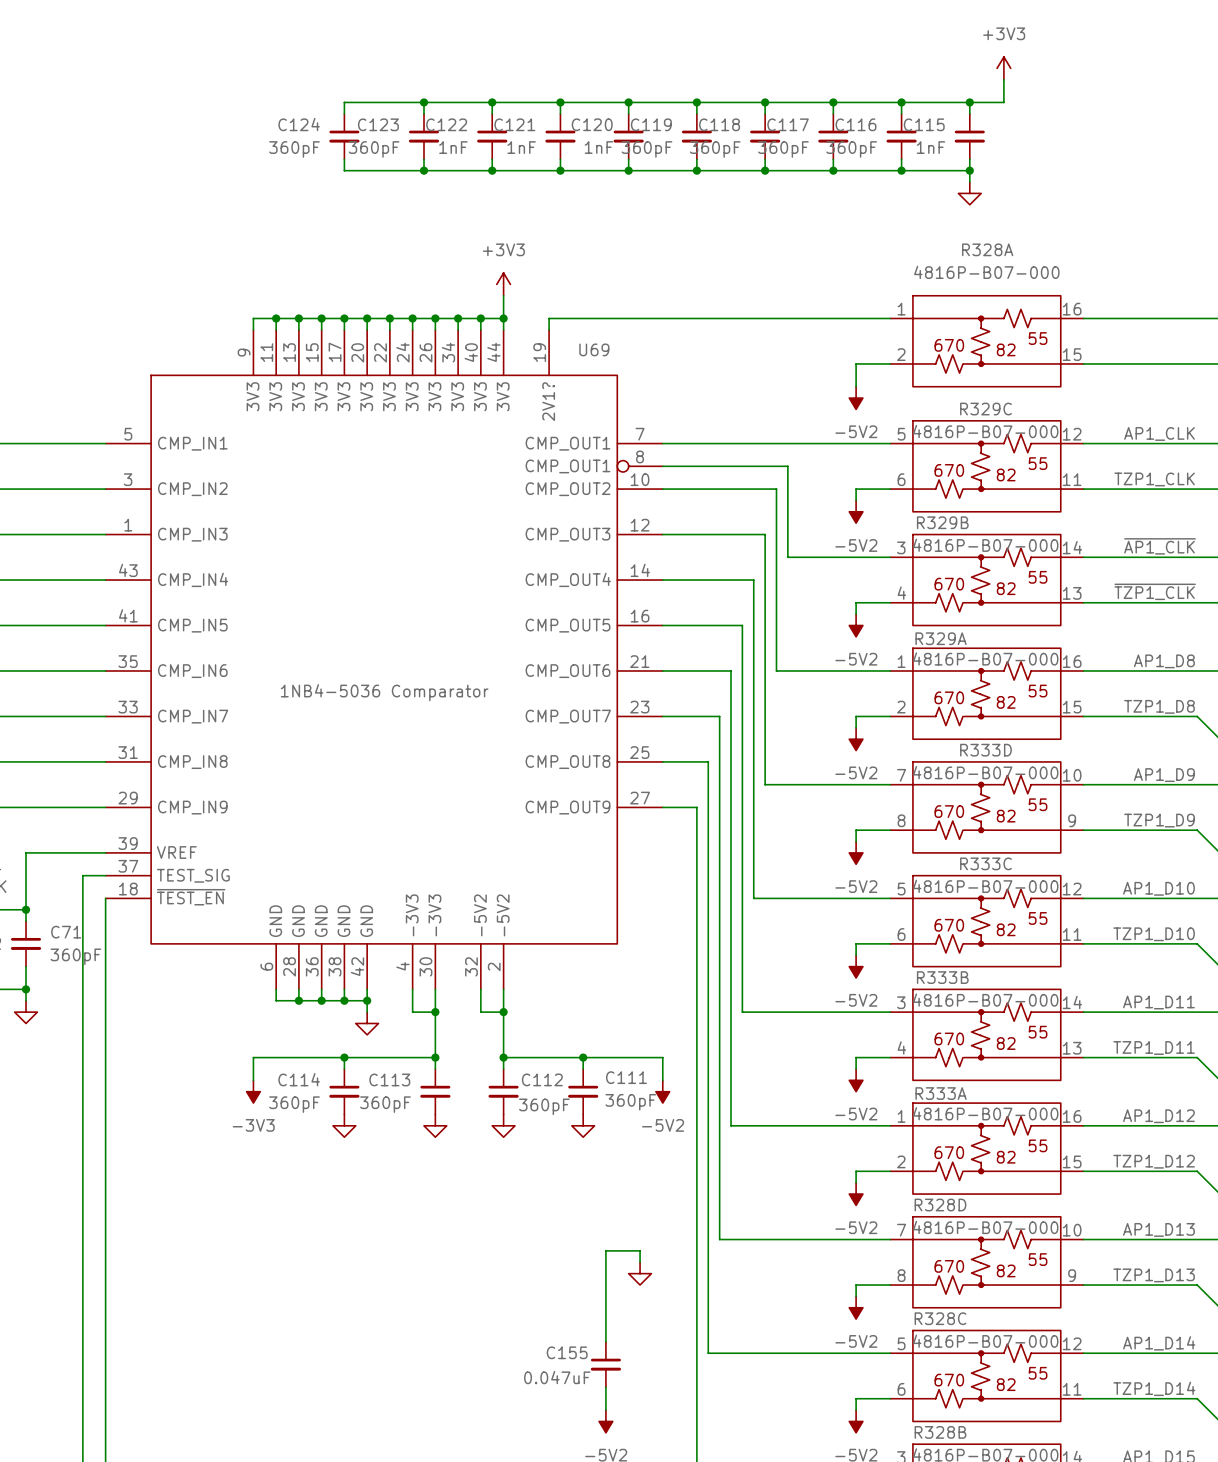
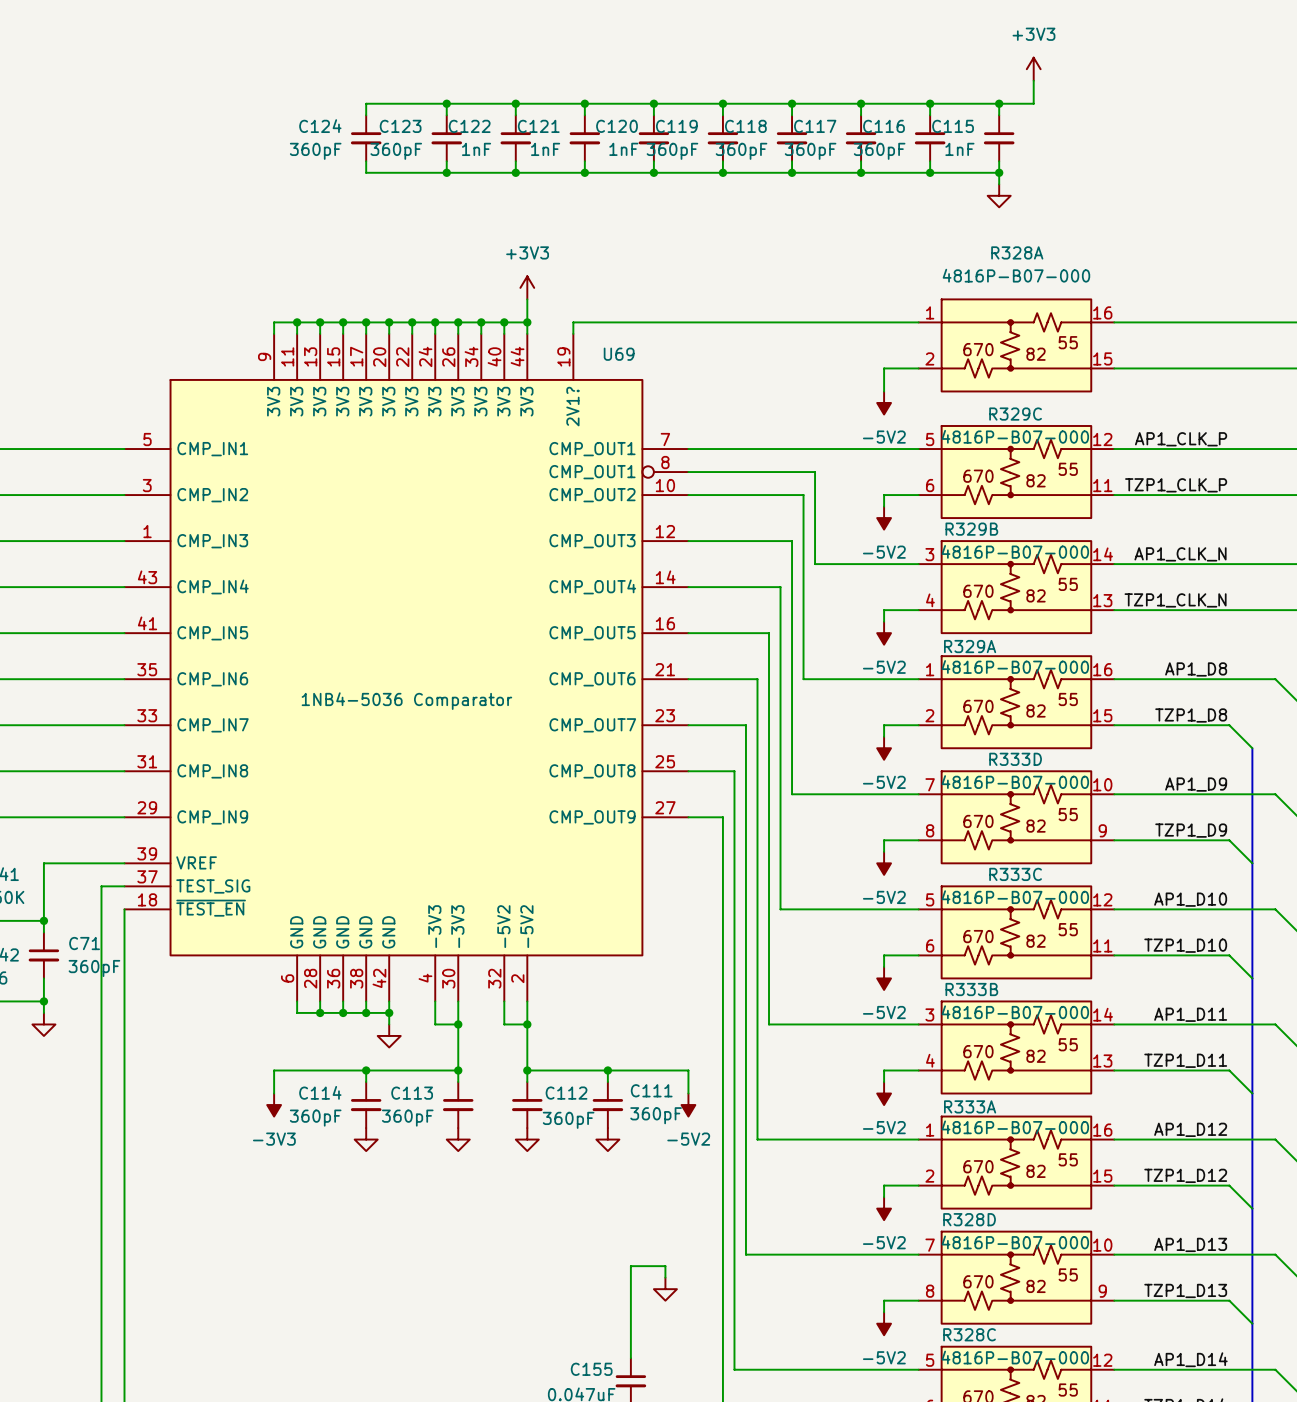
label: AP1_CLK (1159, 433) -> AP1_CLK_P (1181, 439)
label: TZP1_CLK (1154, 479) -> TZP1_CLK_P (1176, 485)
label: ~{AP1_CLK} (1160, 546) -> AP1_CLK_N (1180, 554)
label: ~{TZP1_CLK} (1155, 591) -> TZP1_CLK_N (1175, 600)

